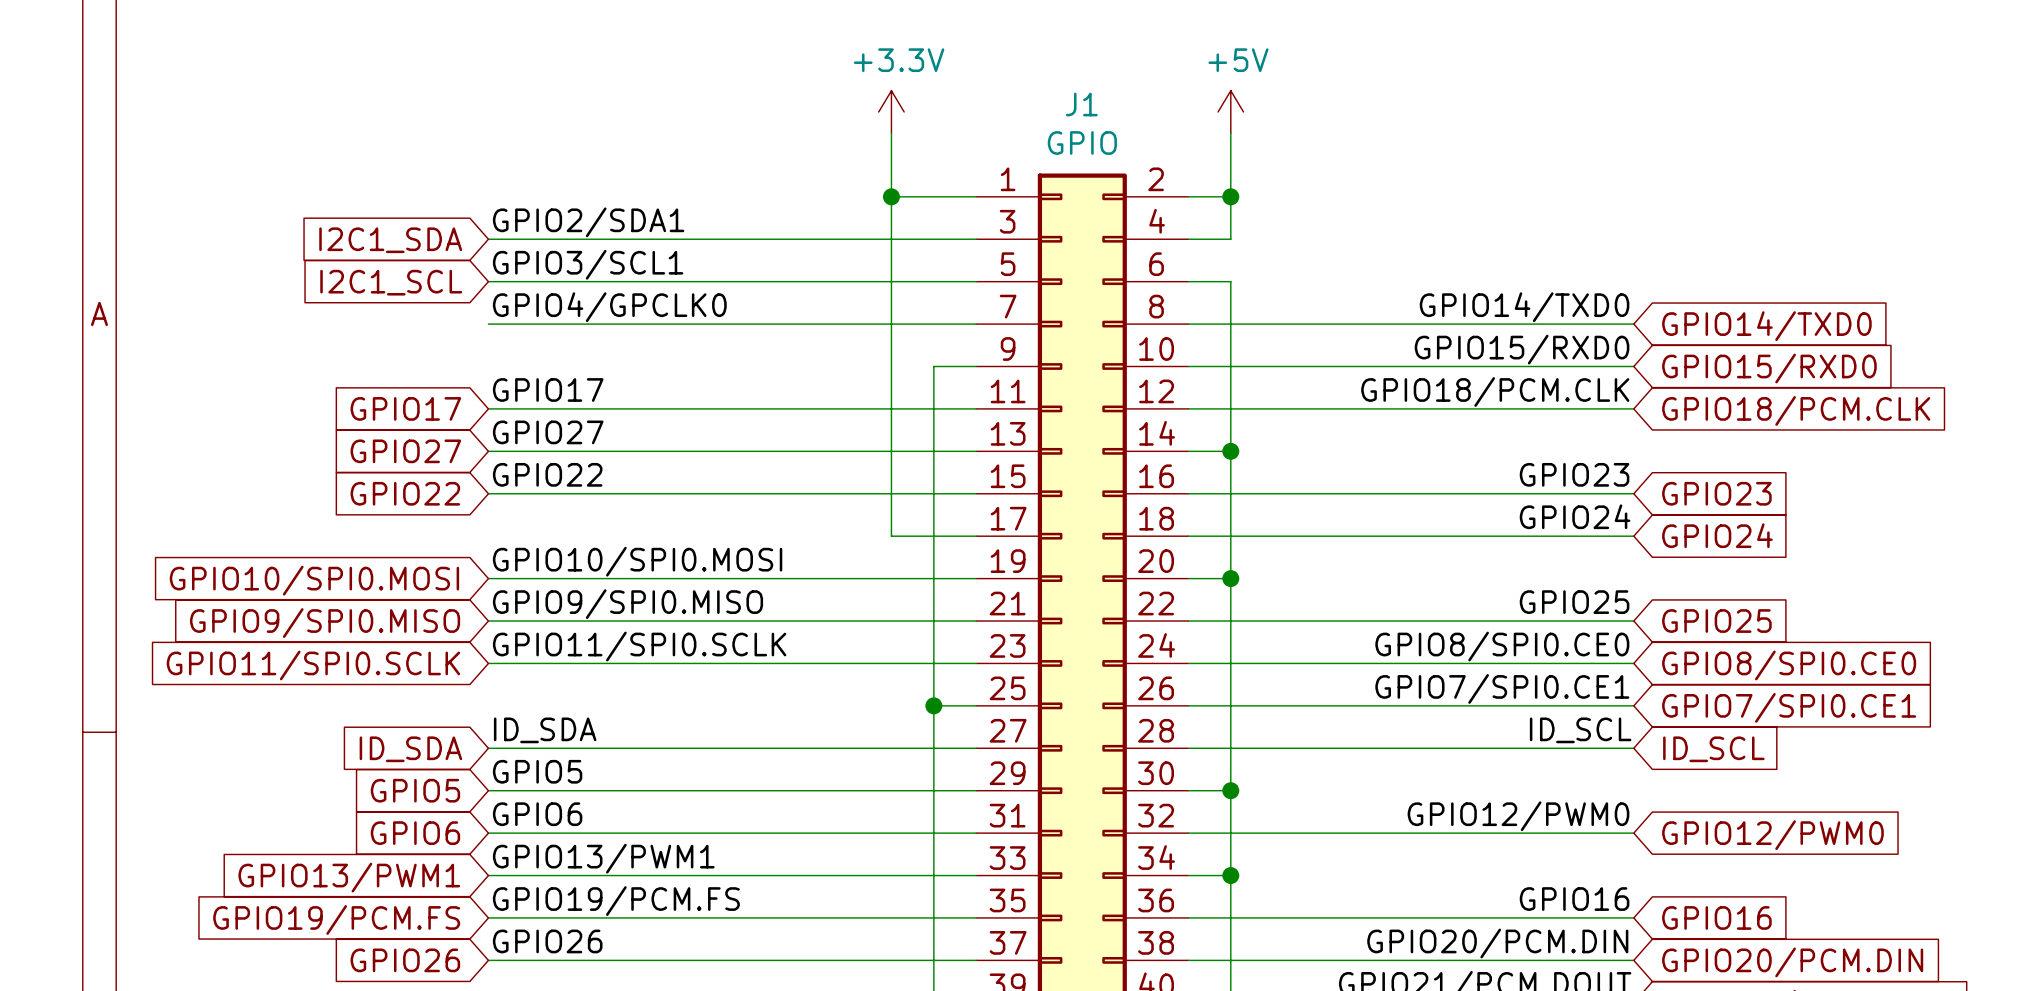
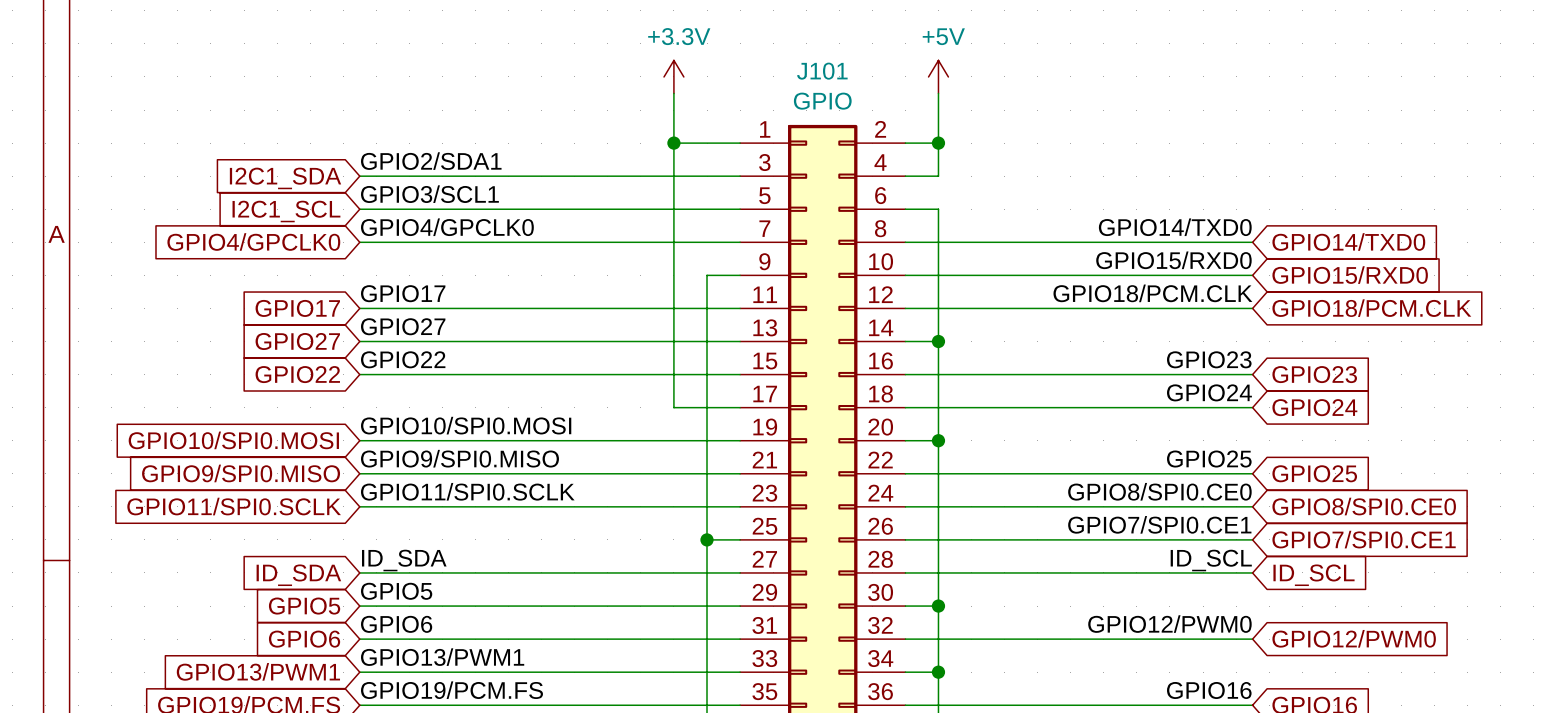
J1 name: J1 (1081, 104) -> J101 (822, 71)
global label: none -> GPIO4/GPCLK0 (253, 241)

